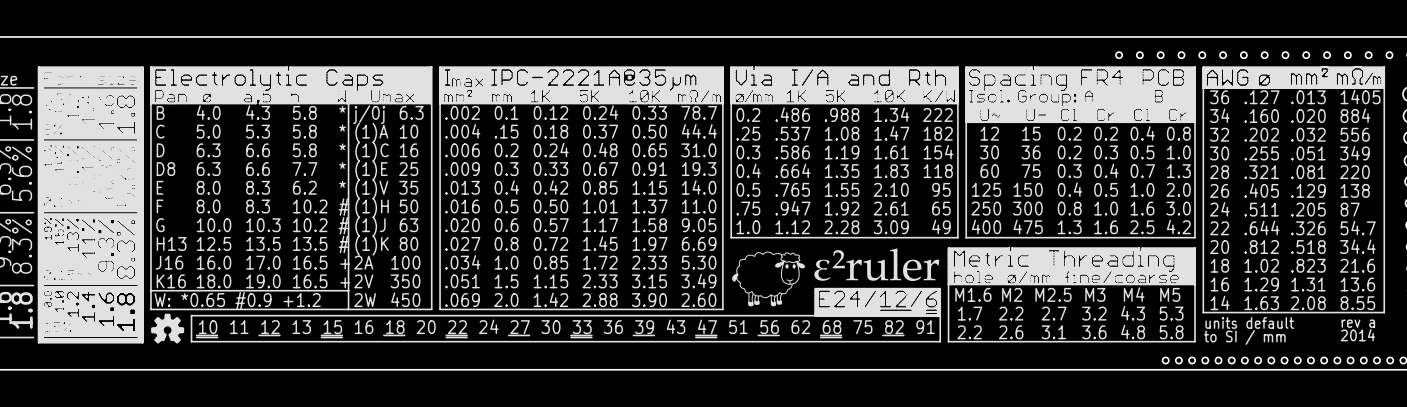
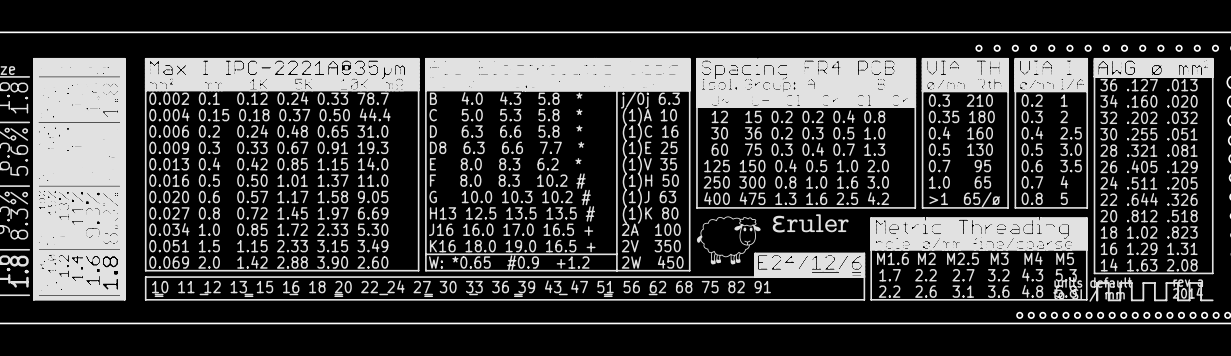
drawing: [150, 66, 1386, 344] -> none
drawing: none -> [145, 58, 1214, 275]
drawing position: (768, 278) -> (728, 240)
drawing position: (1071, 294) -> (978, 258)
drawing position: (877, 302) -> (809, 265)
line: none -> (864, 277) (864, 299) (145, 299) (145, 277) (864, 277)
text: none -> 10 11 12 13 15 16 18 20 22 24 27 30 33 36 39 43 47 51 56 62 68 75 82 91 (461, 286)
text: none -> _ _ _ _ _ _ _ _ _ _ _ _ (406, 294)
text: none -> _ _ _ _ _ _ (383, 296)
line: none -> (1212, 300) (1201, 300) (1201, 283) (1189, 283) (1189, 300) (1178, 300) (1178, 283) (1166, 283) (1166, 300) (1154, 300) (1154, 283) (1143, 283) (1143, 300) (1131, 300) (1131, 283) (1120, 283) (1120, 300) (1108, 300) (1108, 283) (1097, 283) (1097, 300)

